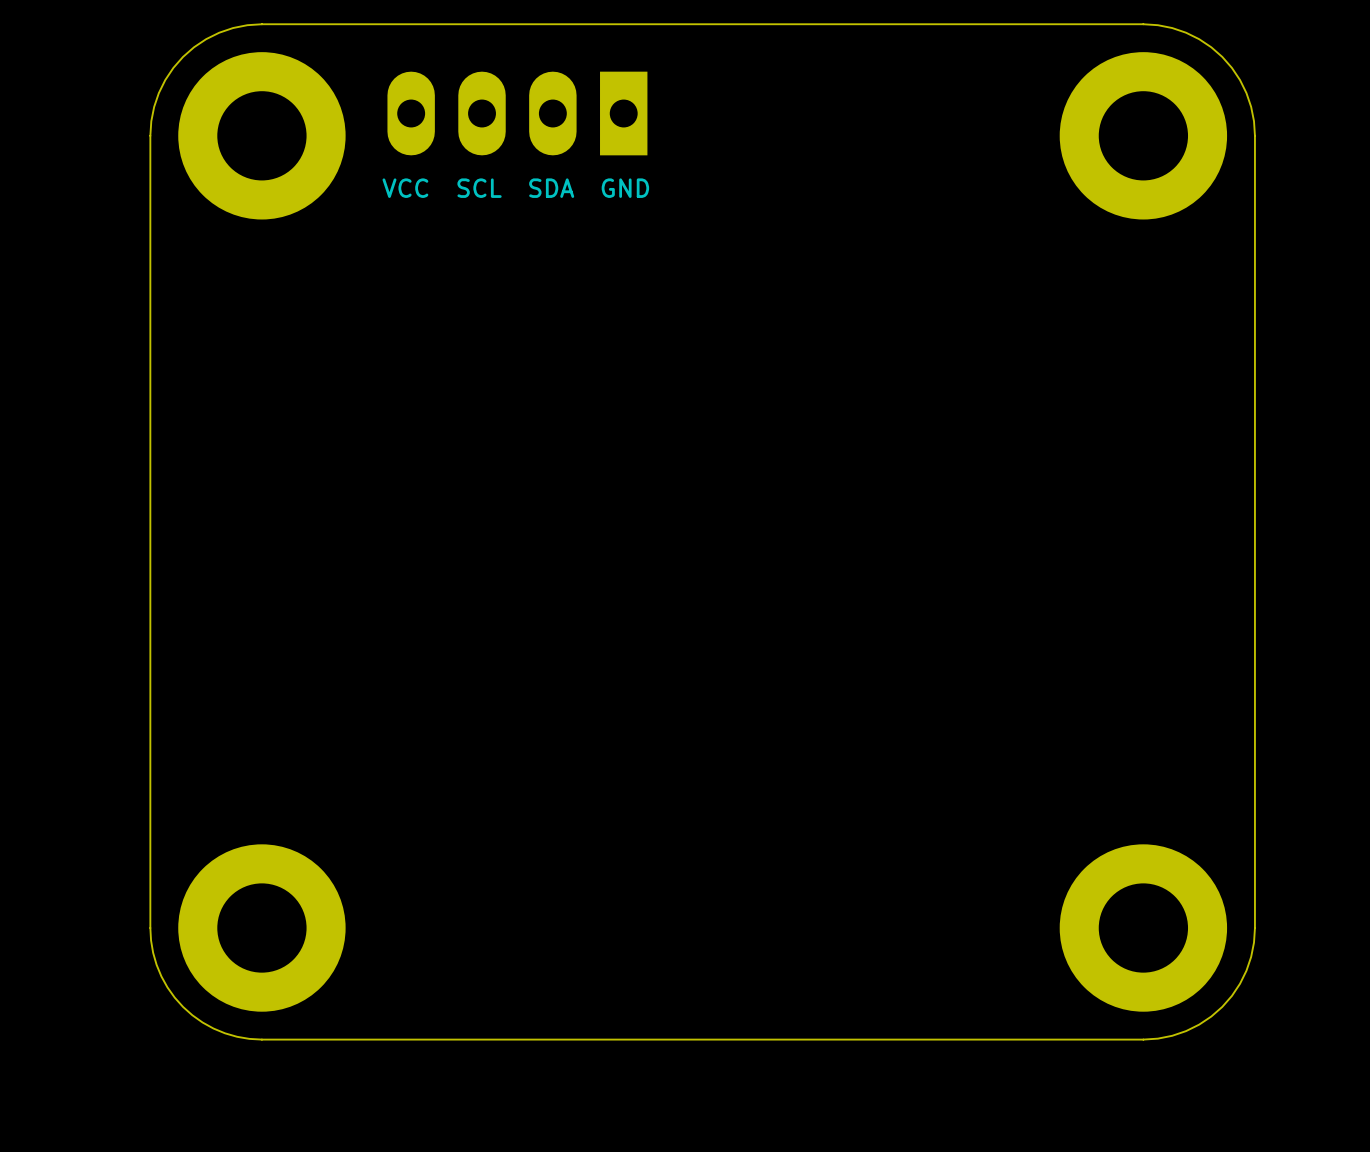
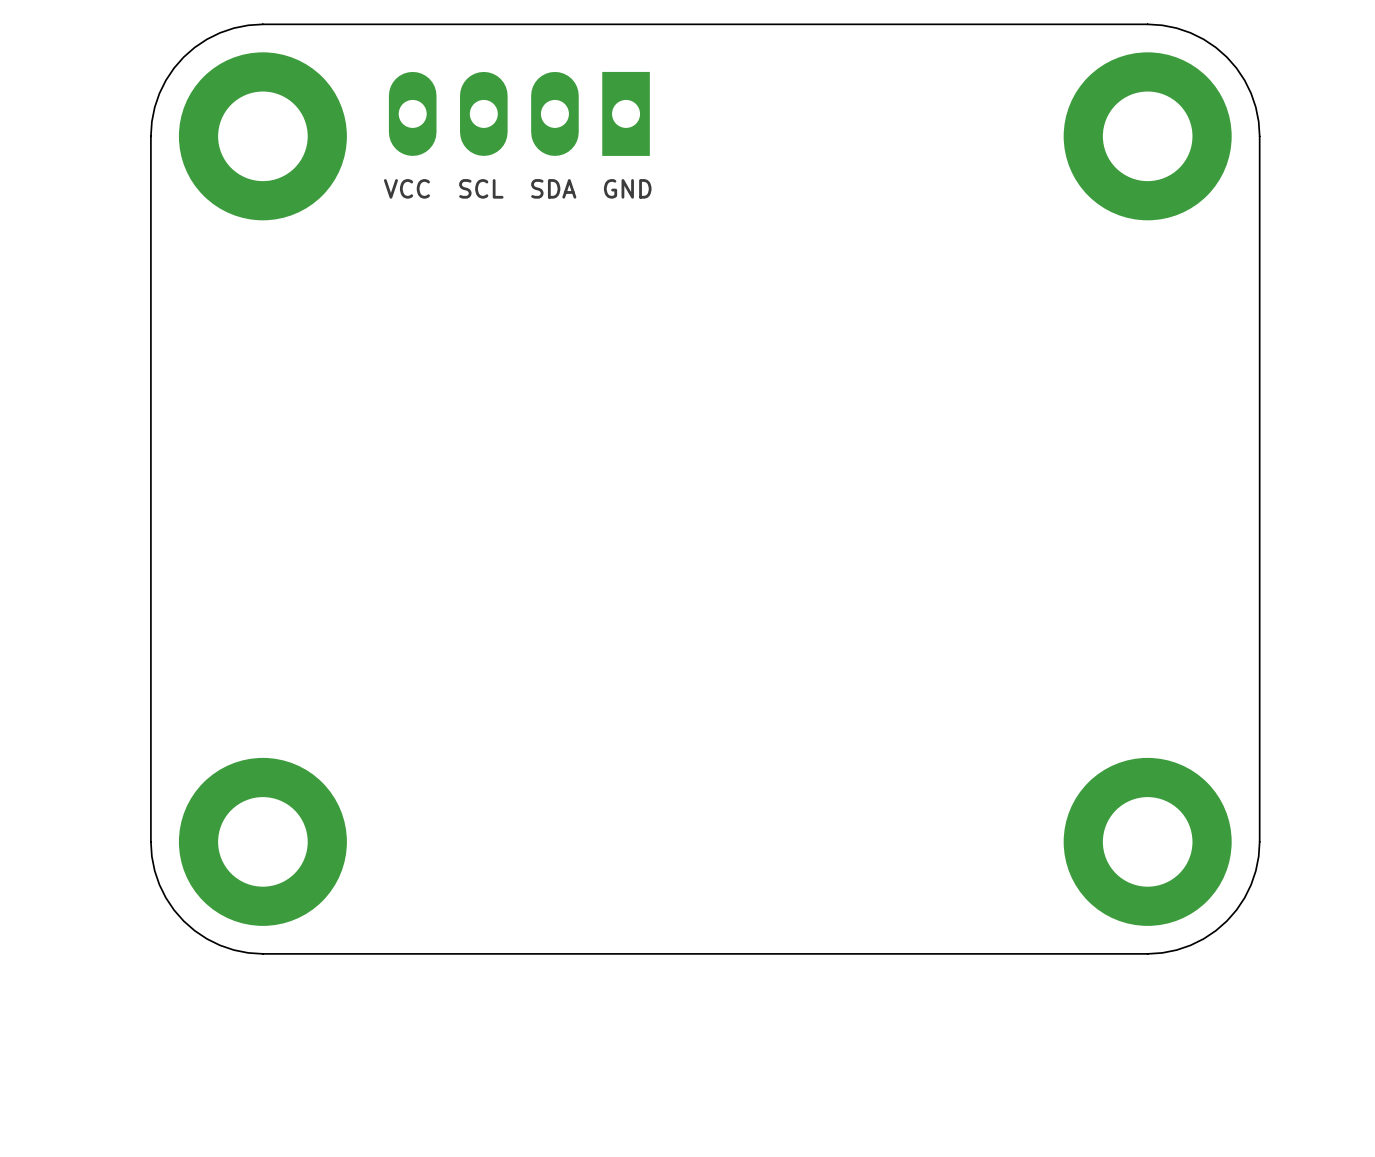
board edge: (1254, 838) (1254, 942) (1246, 970) (1240, 983) (1222, 1006) (1199, 1024) (1172, 1035) (1143, 1039) (261, 1039) (237, 1036) (213, 1028) (192, 1015) (174, 997) (161, 976) (151, 940) (150, 838) -> (1259, 841) (1258, 856) (1251, 884) (1244, 897) (1226, 921) (1203, 938) (1190, 945) (1176, 950) (1147, 953) (248, 952) (220, 945) (194, 930) (183, 921) (174, 910) (159, 884) (151, 856) (150, 841)
part position: (261, 928) -> (262, 841)
part position: (1143, 928) -> (1147, 841)

